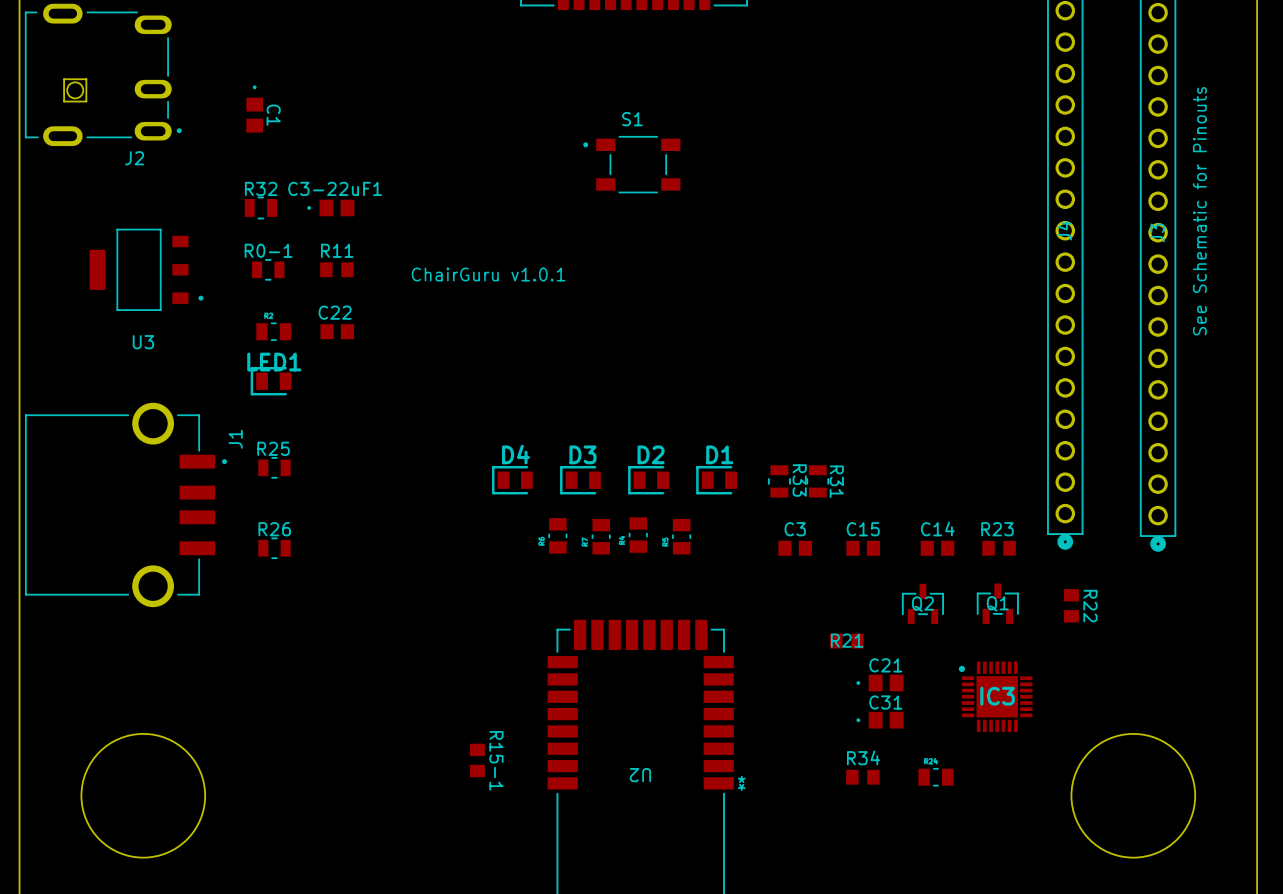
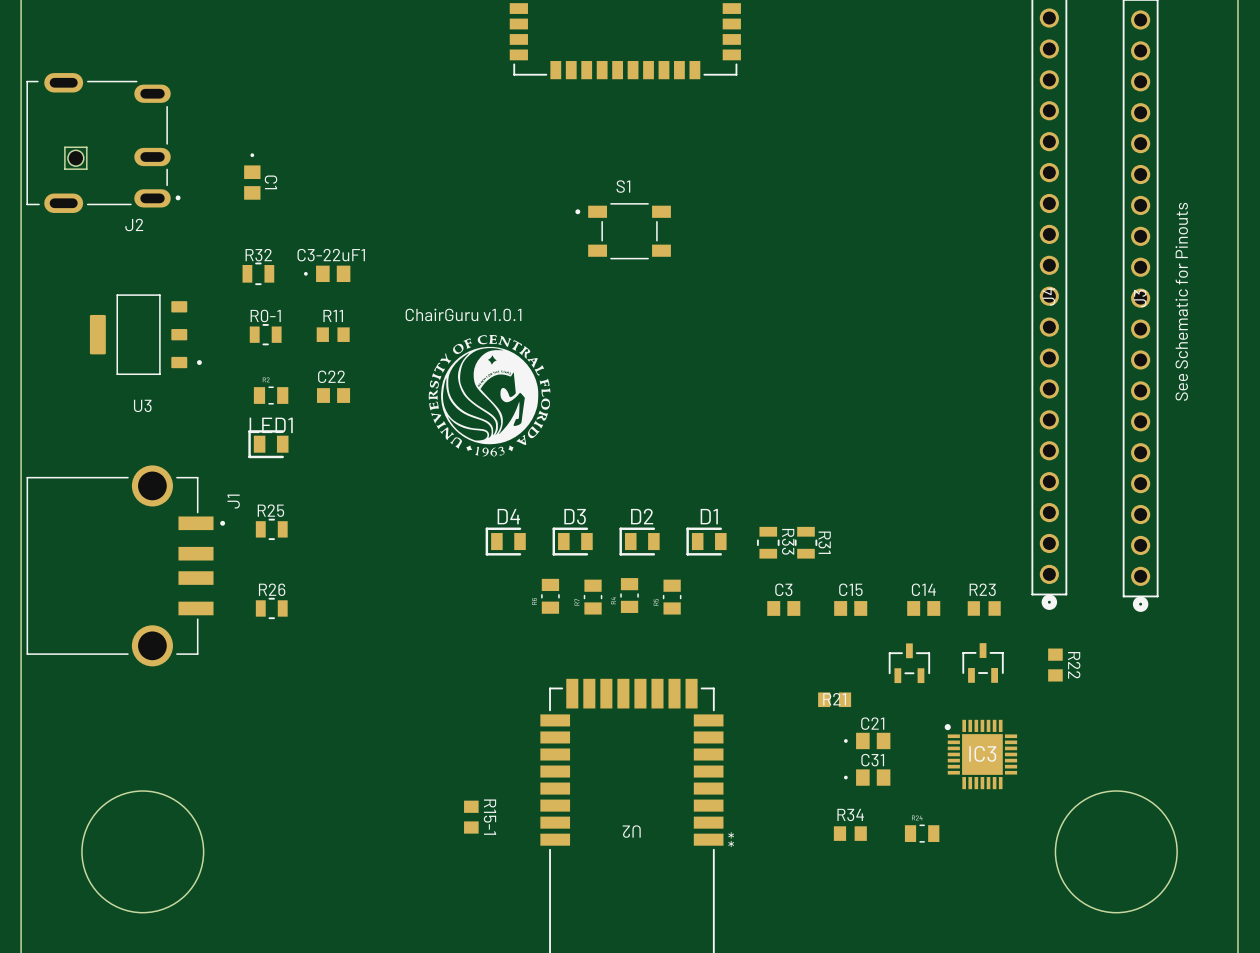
drawing: none -> [428, 335, 551, 457]
text position: ChairGuru v1.0.1 (488, 274) -> ChairGuru v1.0.1 (463, 314)
Q1 name: Q1 (997, 603) -> none
Q2 name: Q2 (922, 604) -> none

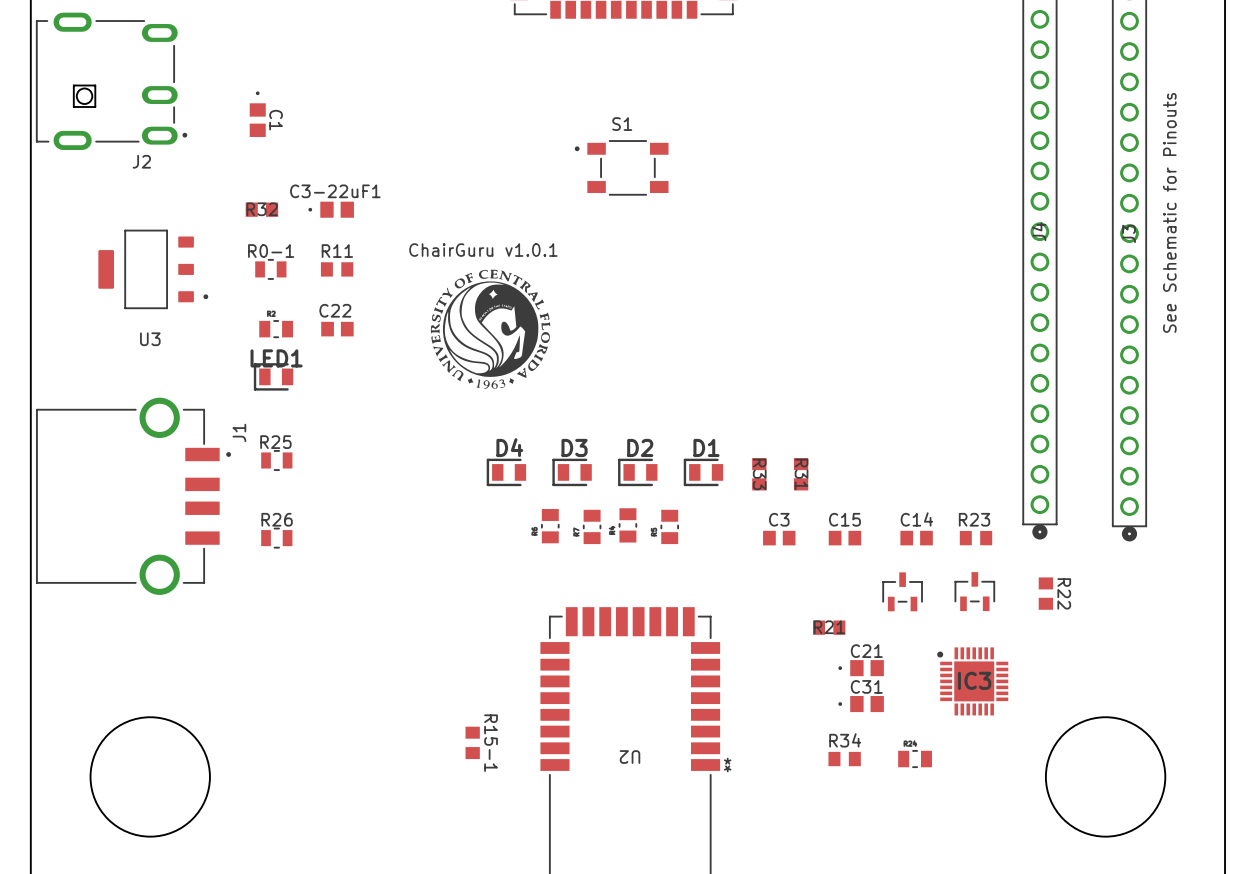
R32 footprint: [242, 262, 275, 286] -> [245, 202, 279, 217]
R33 footprint: [756, 526, 780, 559] -> [752, 457, 767, 491]
R31 footprint: [794, 526, 818, 559] -> [793, 457, 809, 491]

